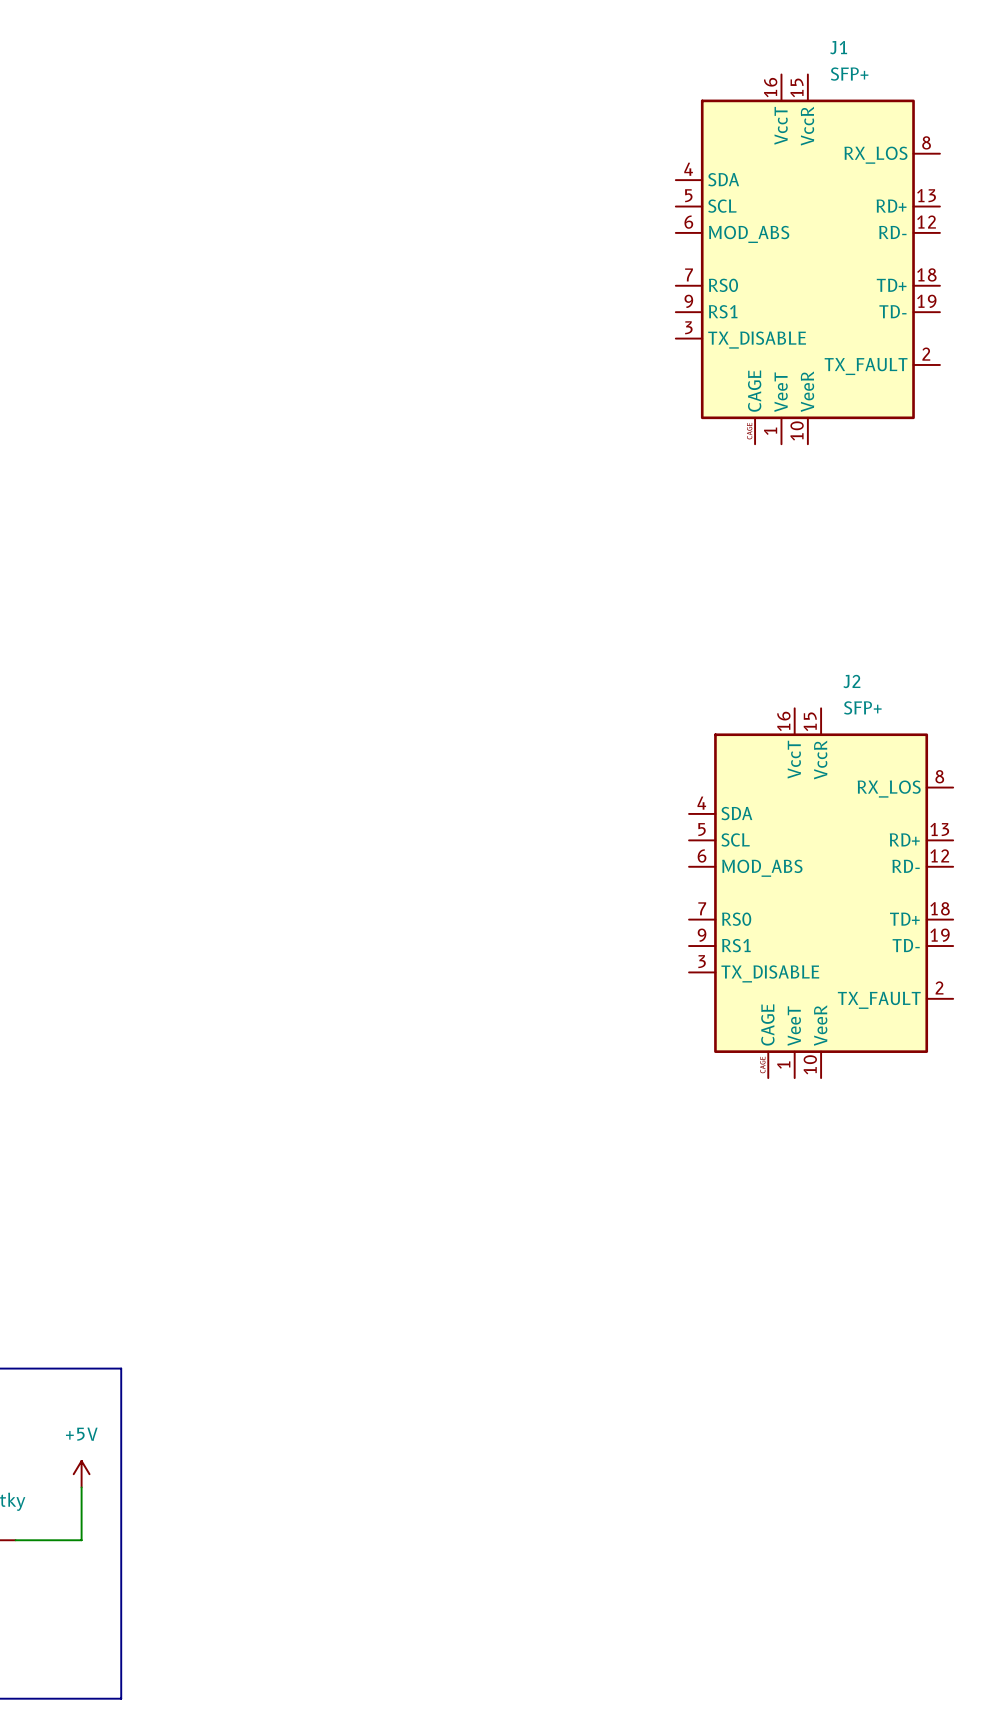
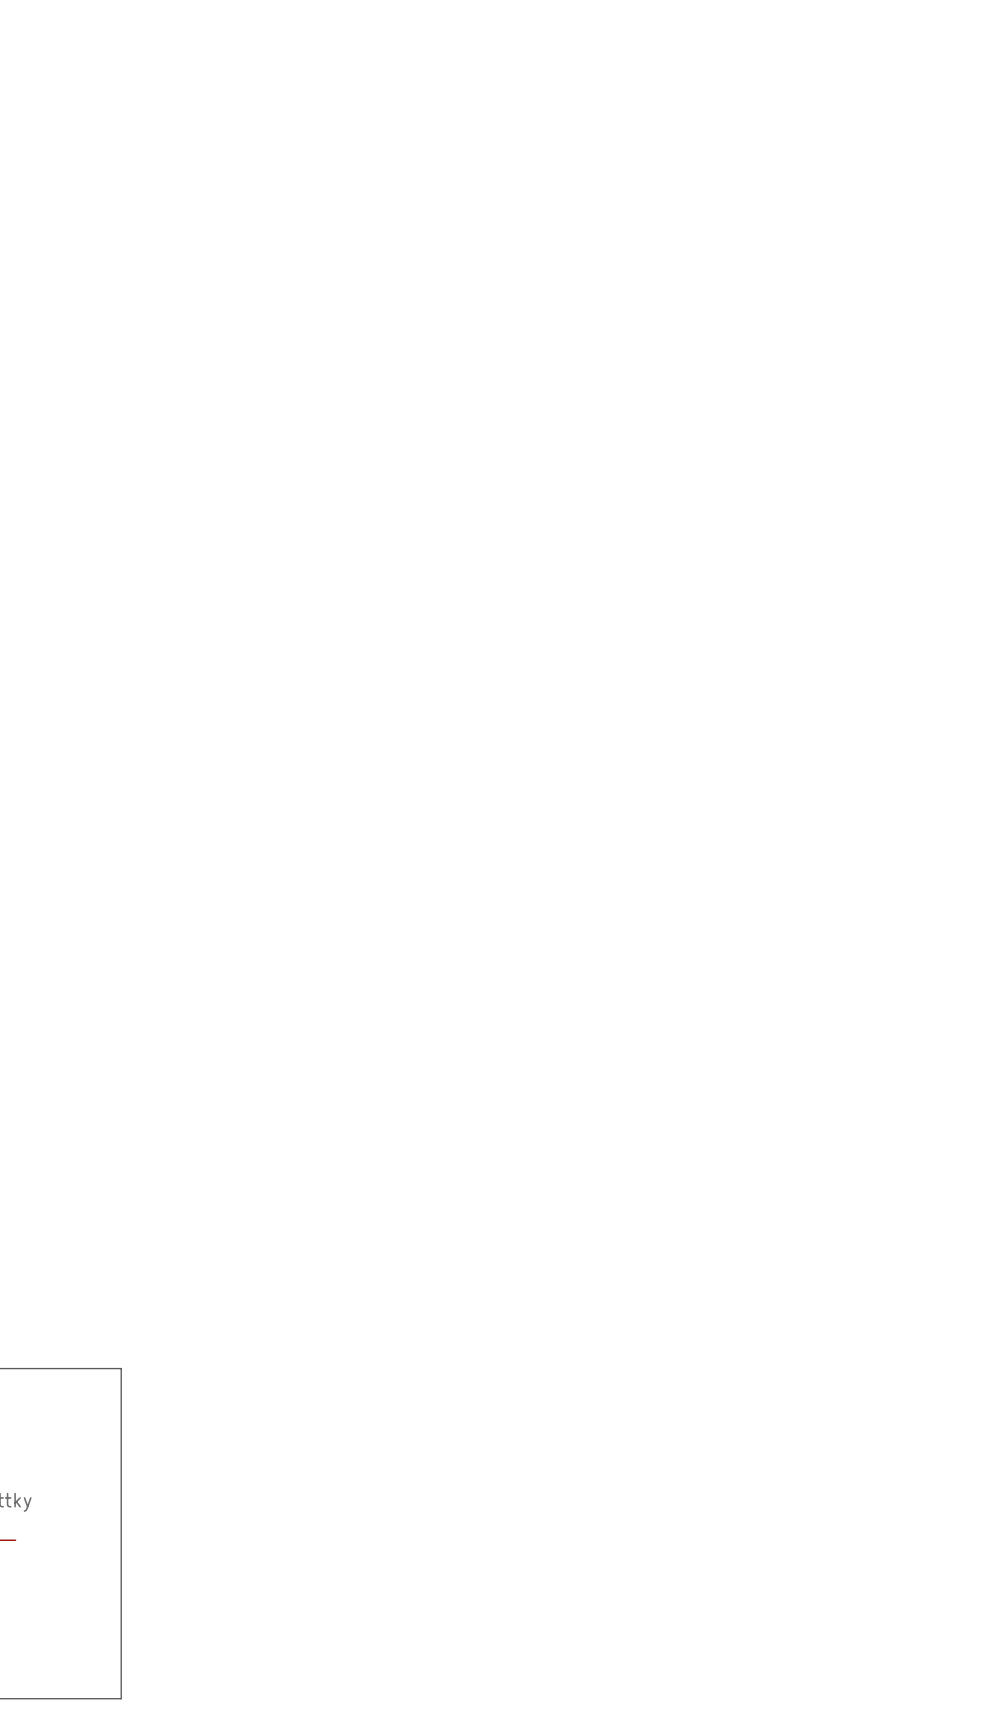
J1: SFP+ (807, 259) -> none
J2: SFP+ (821, 893) -> none
power symbol: +5V (81, 1474) -> none
wire: (81, 1487) (81, 1540) (15, 1540) -> none

